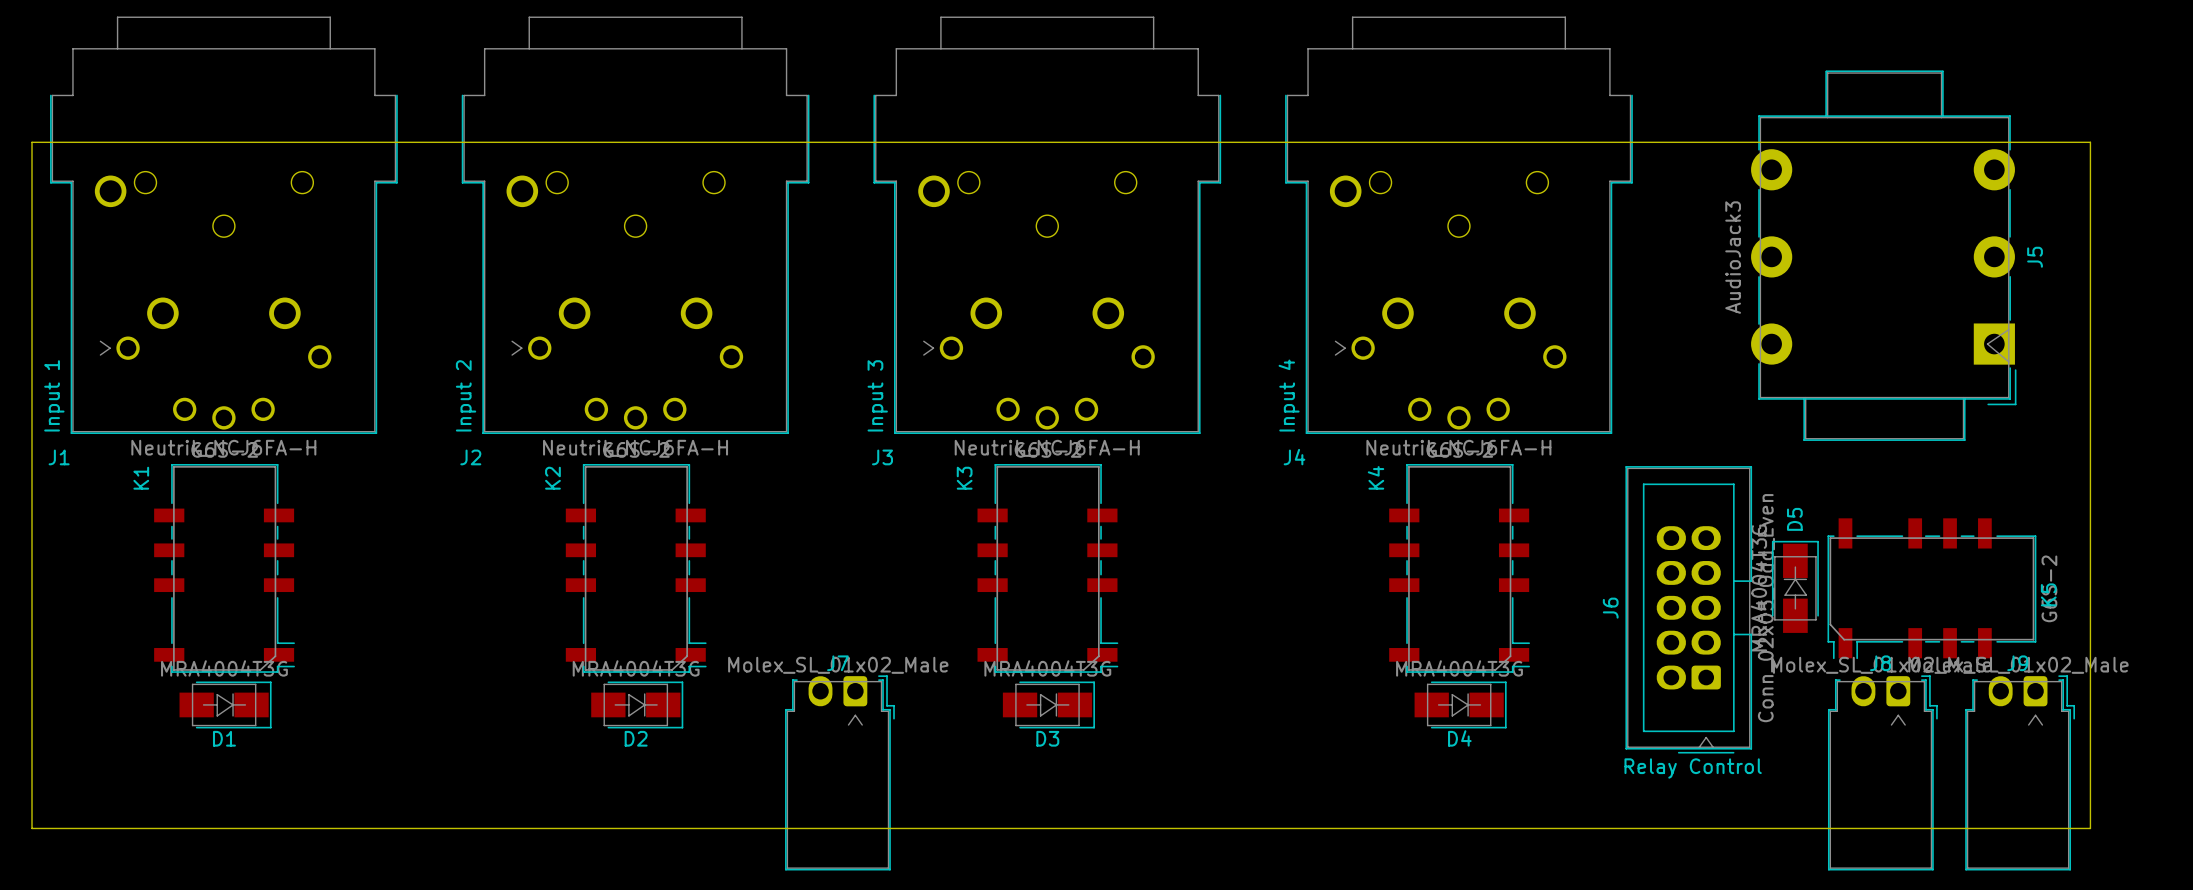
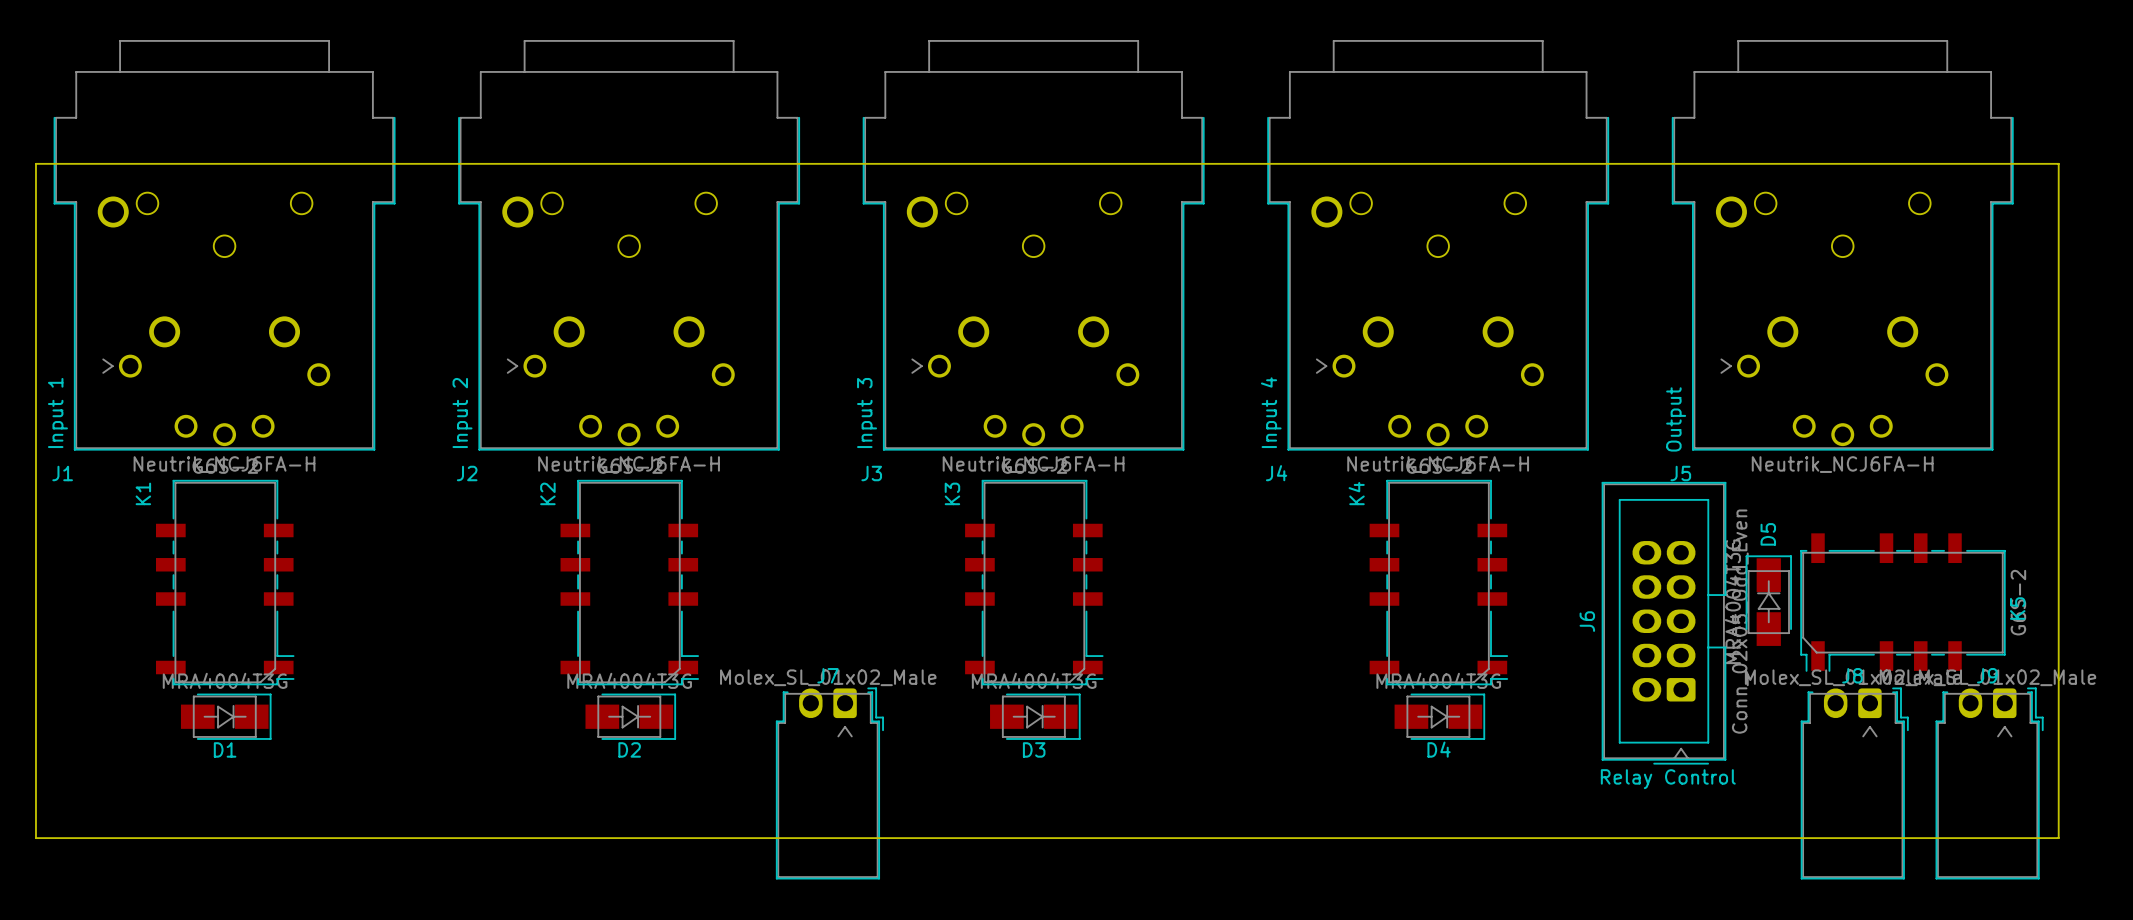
J5 footprint: [1751, 70, 2017, 441] -> [1671, 40, 2014, 451]
J5 value: AudioJack3 (1733, 257) -> Neutrik_NCJ6FA-H (1842, 464)
J5 name position: J5 (2035, 257) -> J5 (1680, 473)

